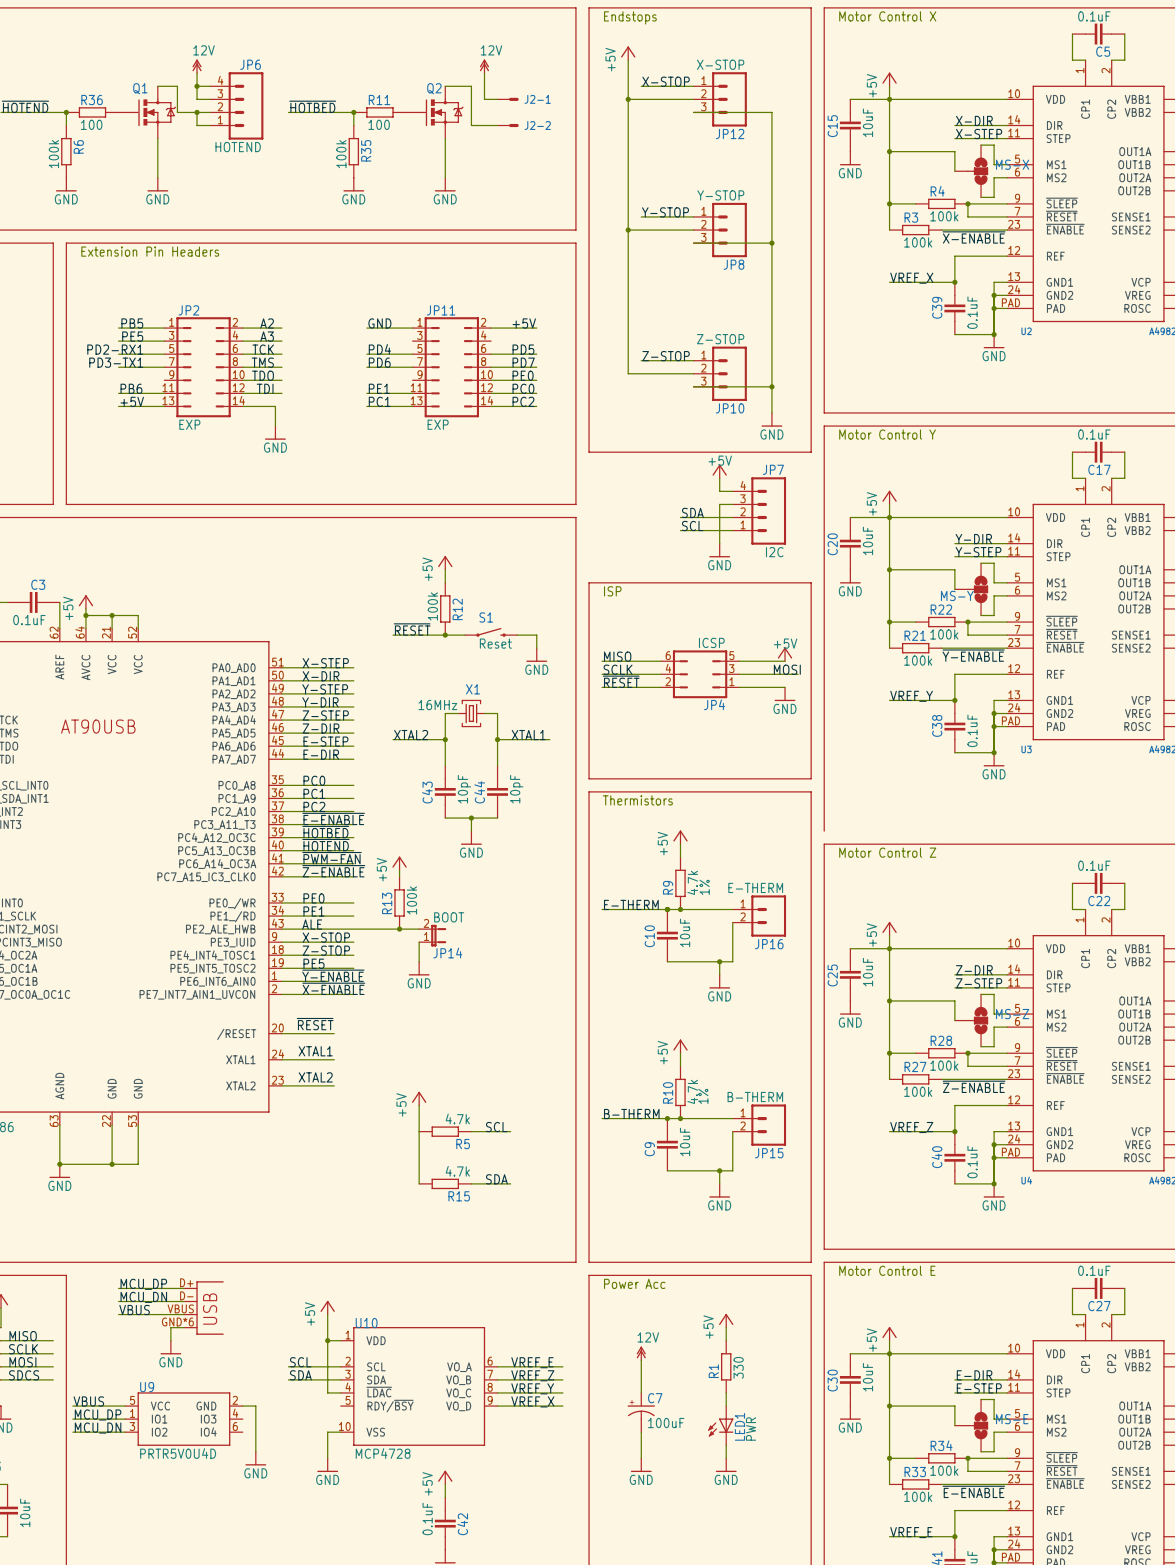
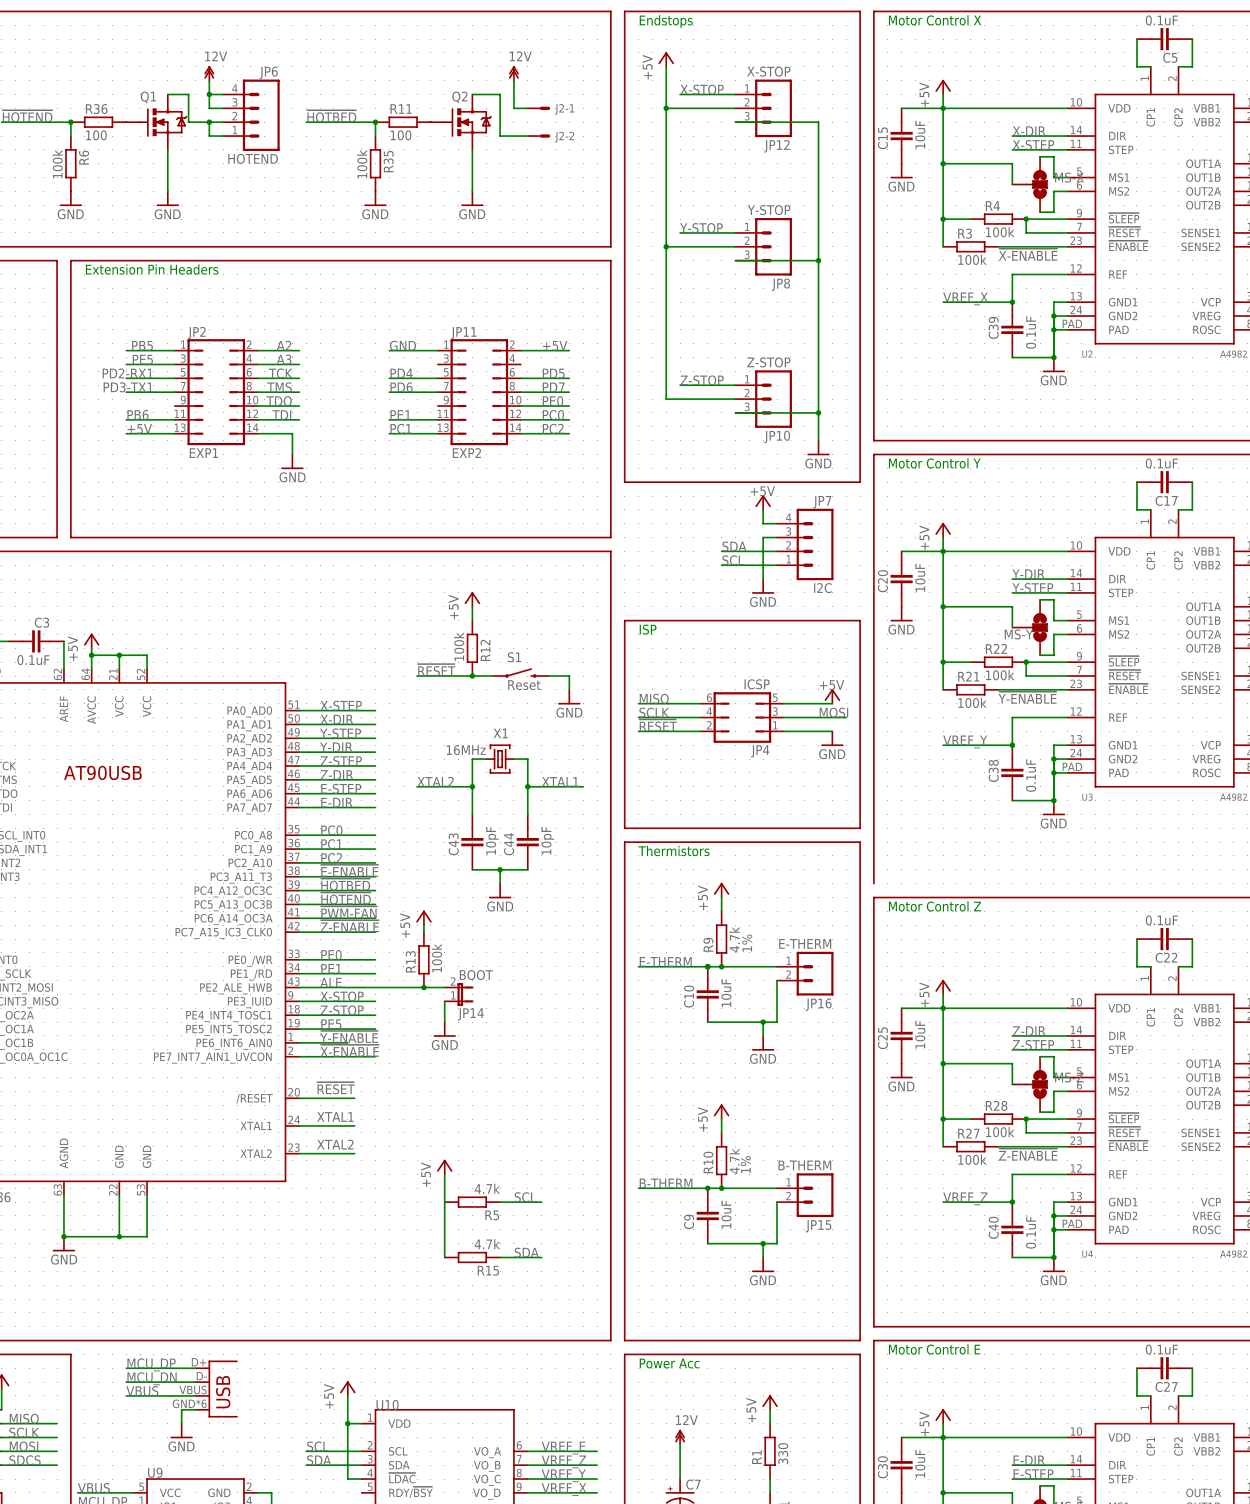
JP2 value: EXP (189, 424) -> EXP1 (203, 453)
JP11 value: EXP (438, 424) -> EXP2 (466, 453)

